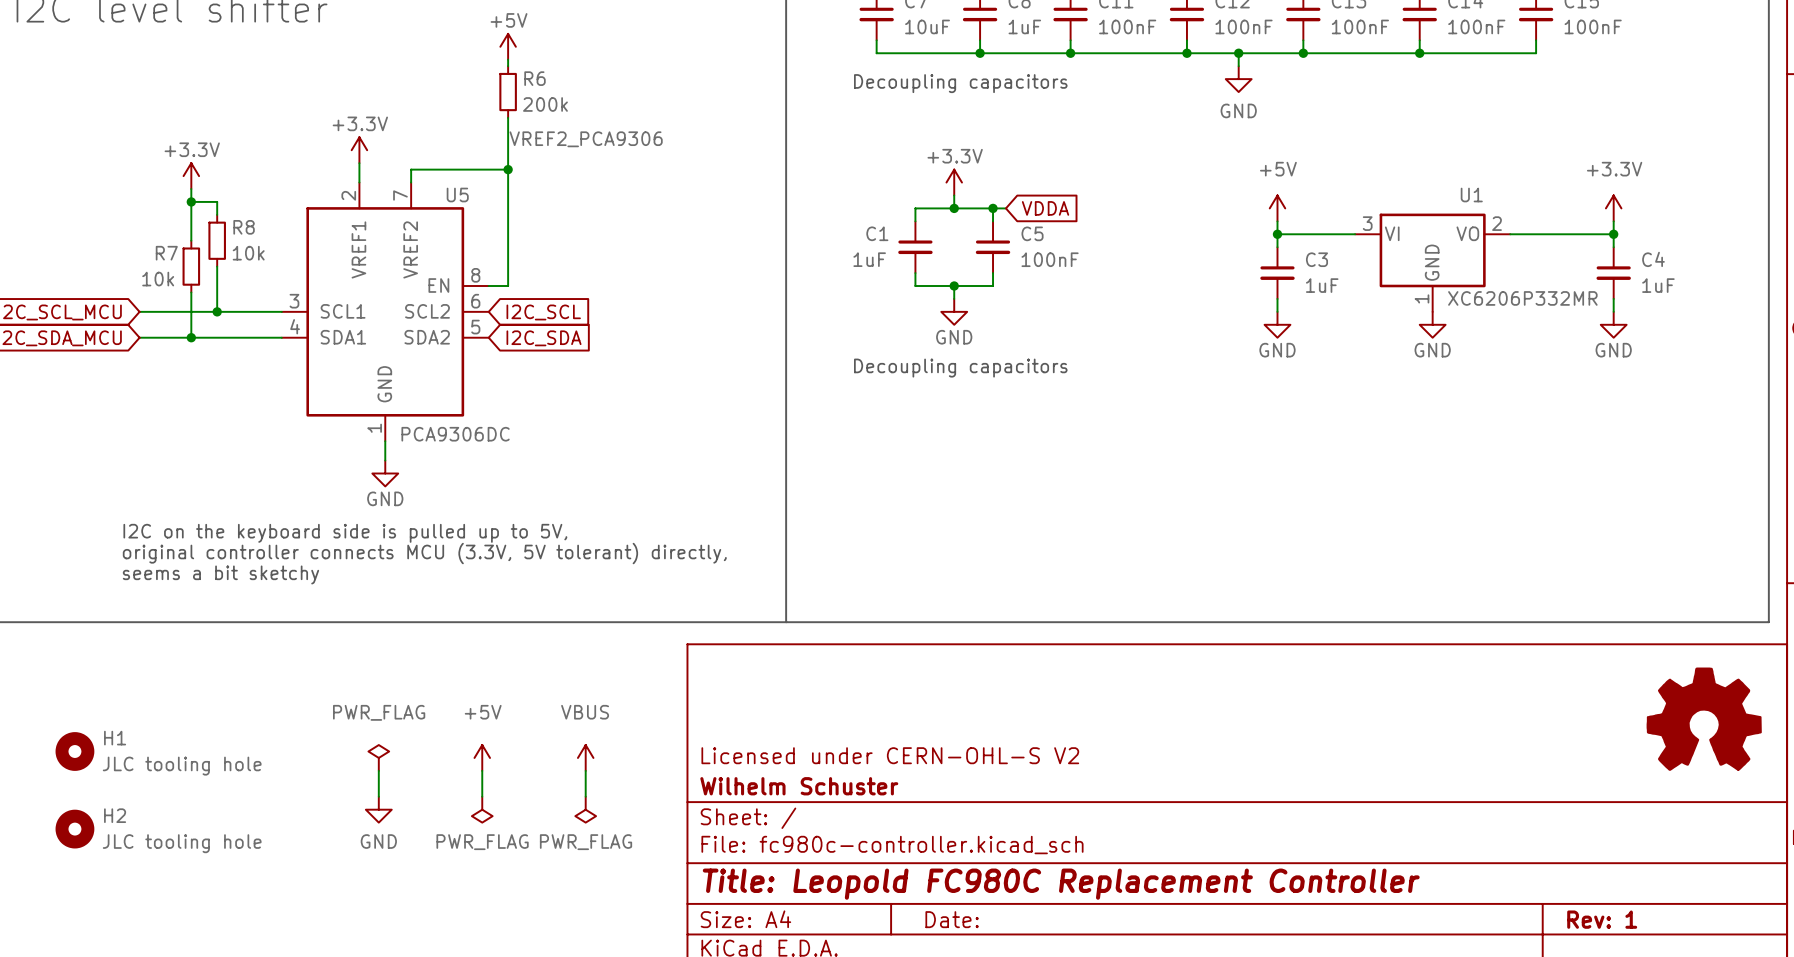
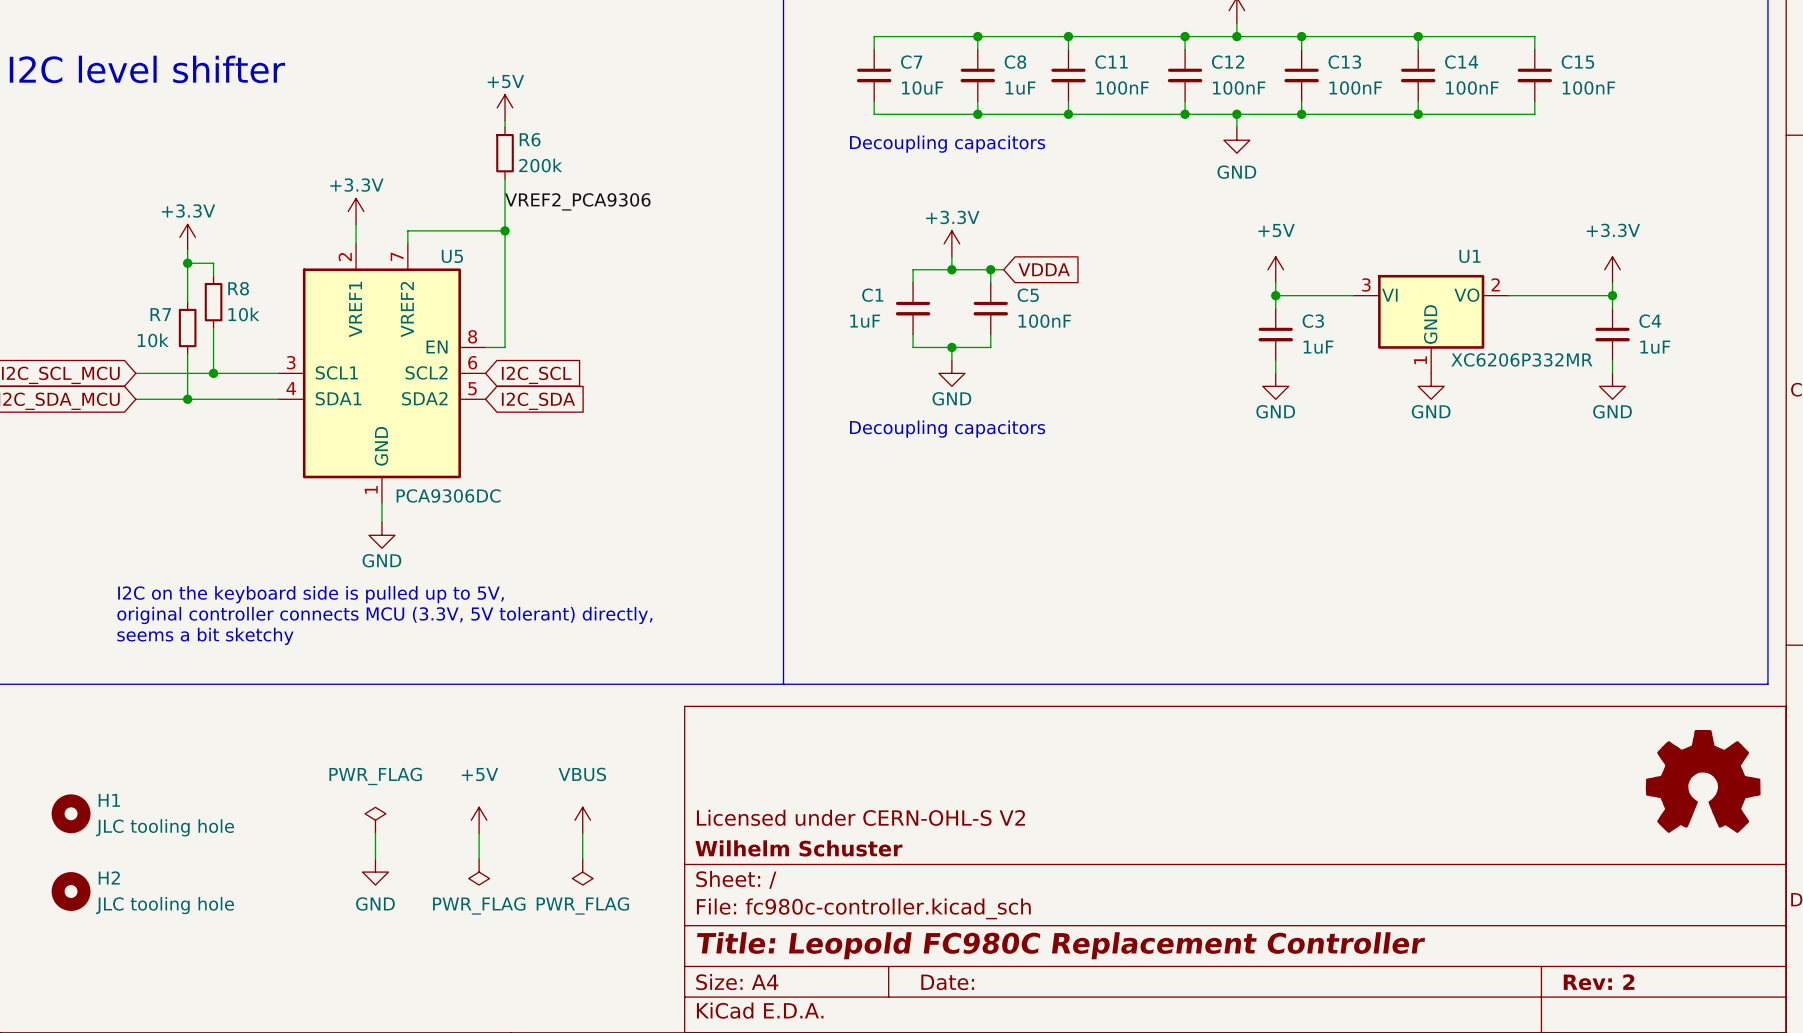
title block: Rev: 1 (1602, 919) -> Rev: 2 (1599, 982)

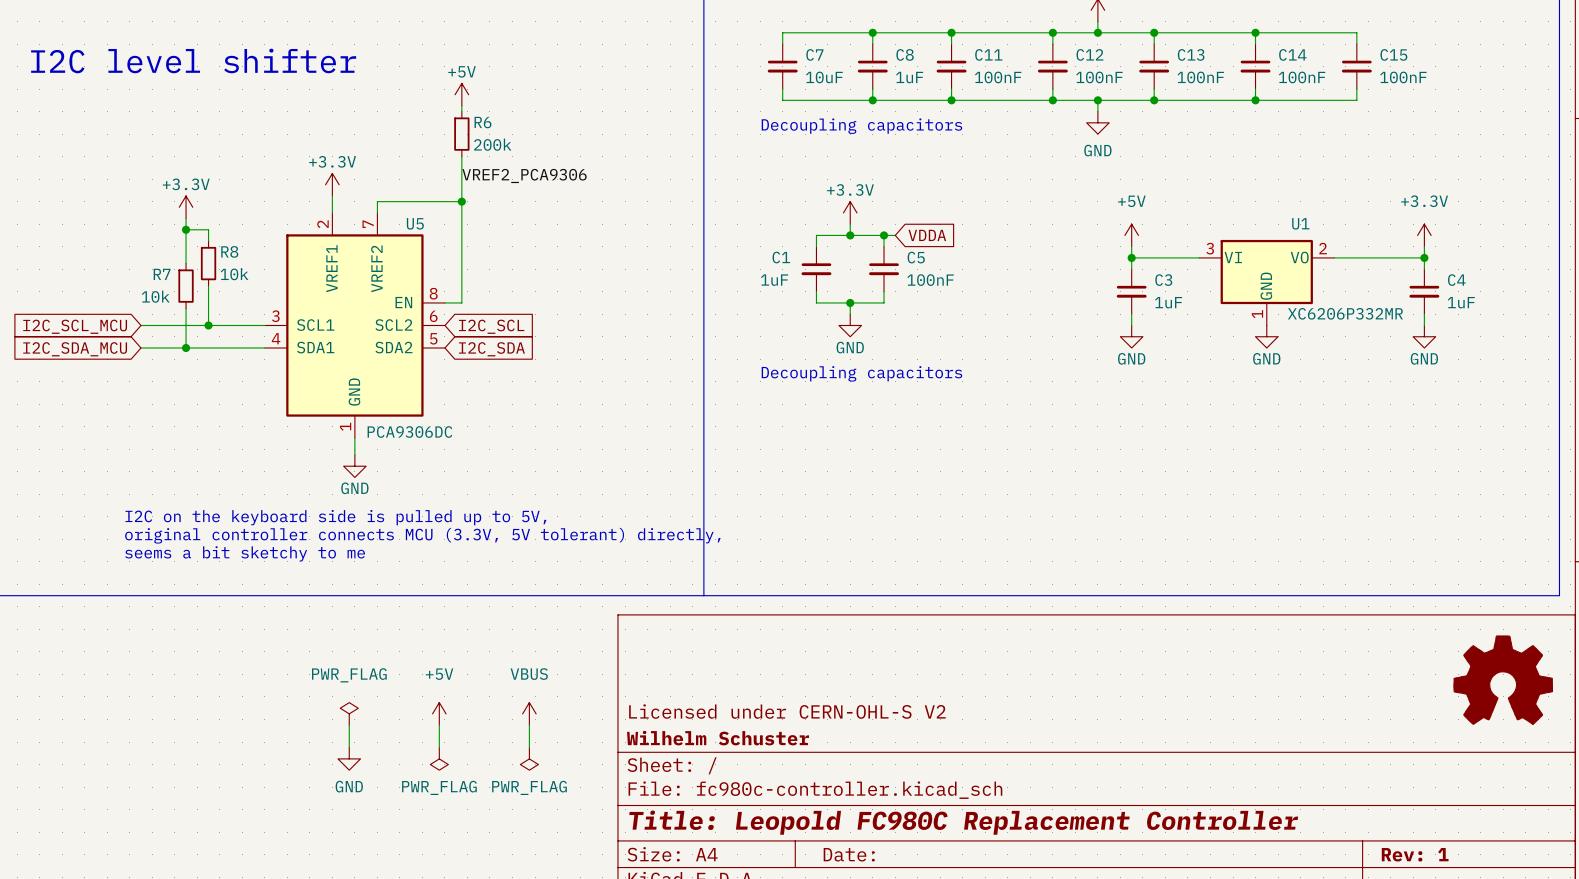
text: seems a bit sketchy (205, 636) -> seems a bit sketchy to me (245, 553)
H1: JLC tooling hole (71, 813) -> none
H2: JLC tooling hole (71, 891) -> none
title block: Rev: 2 (1599, 982) -> Rev: 1 (1415, 854)

